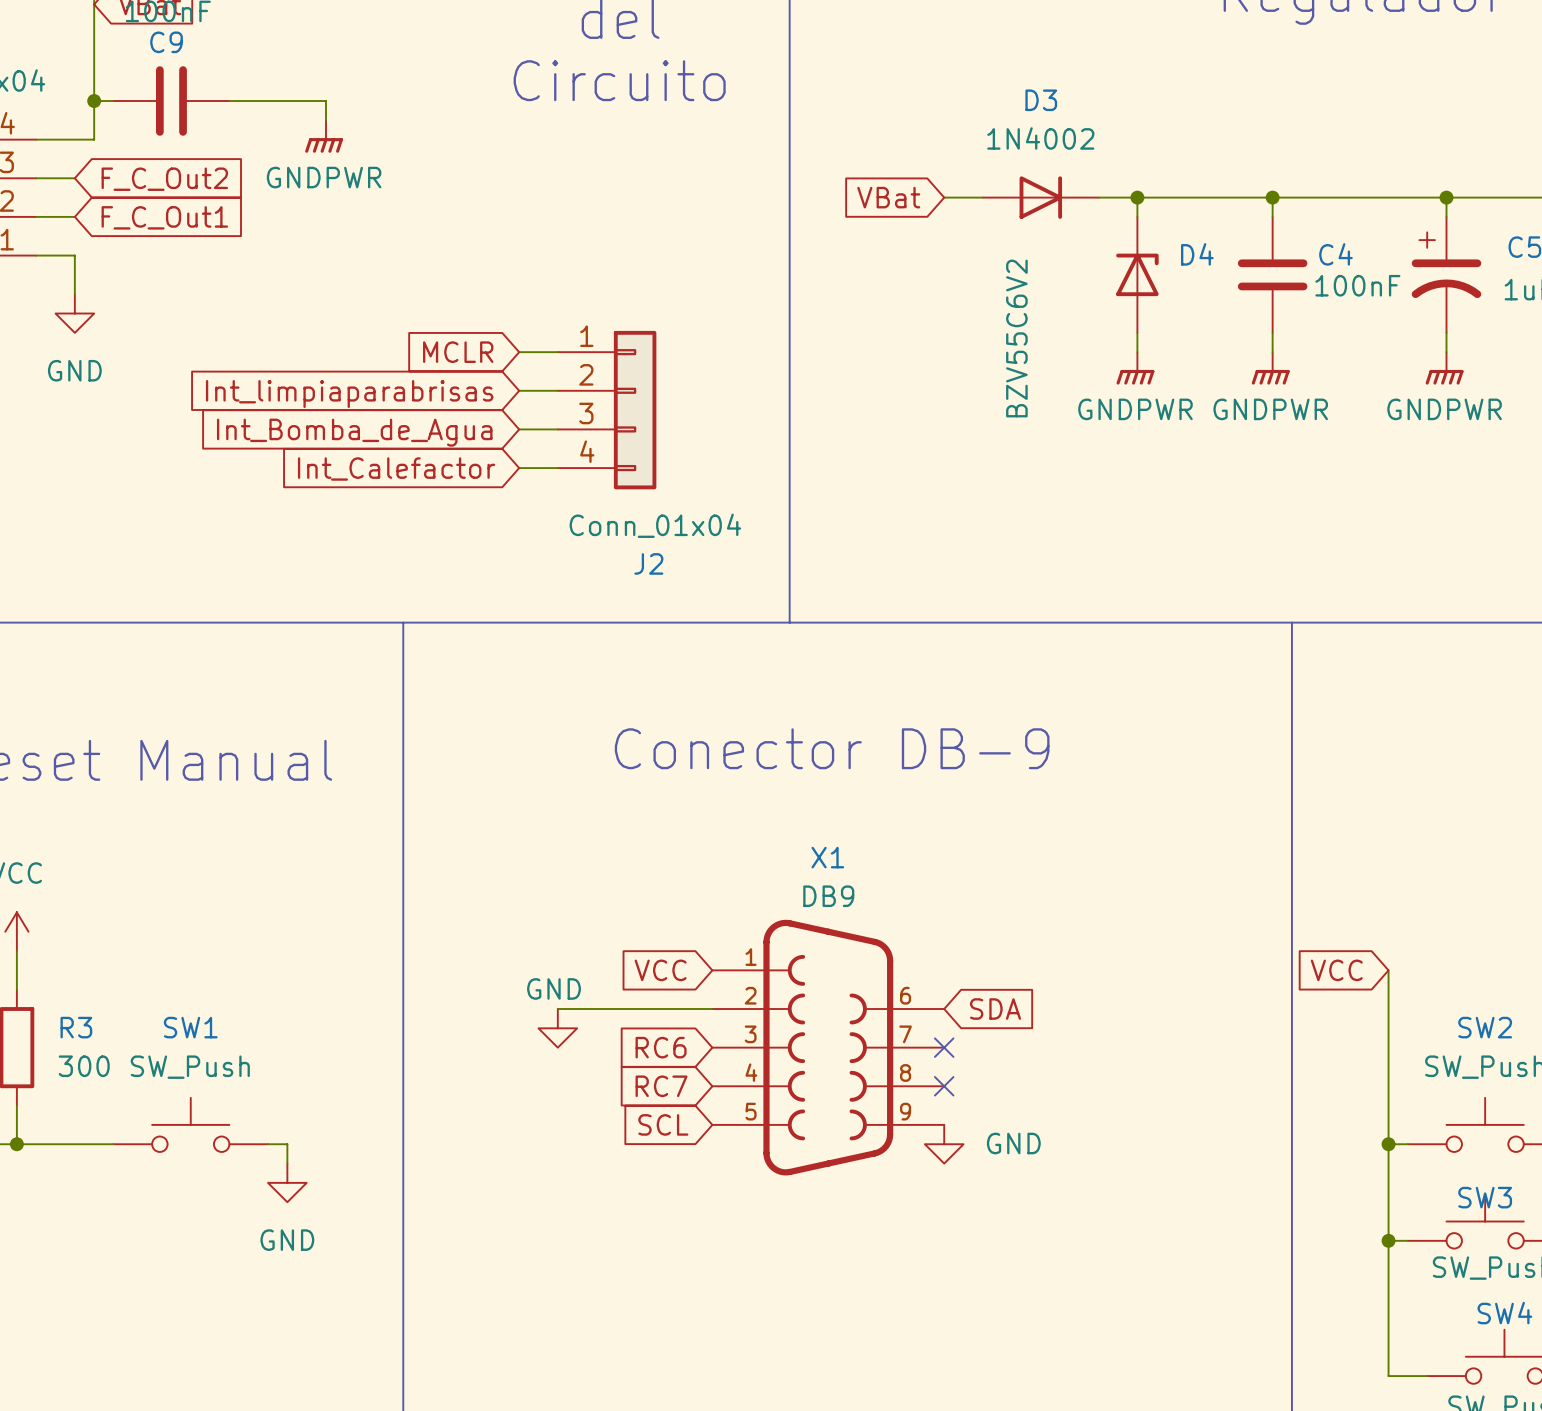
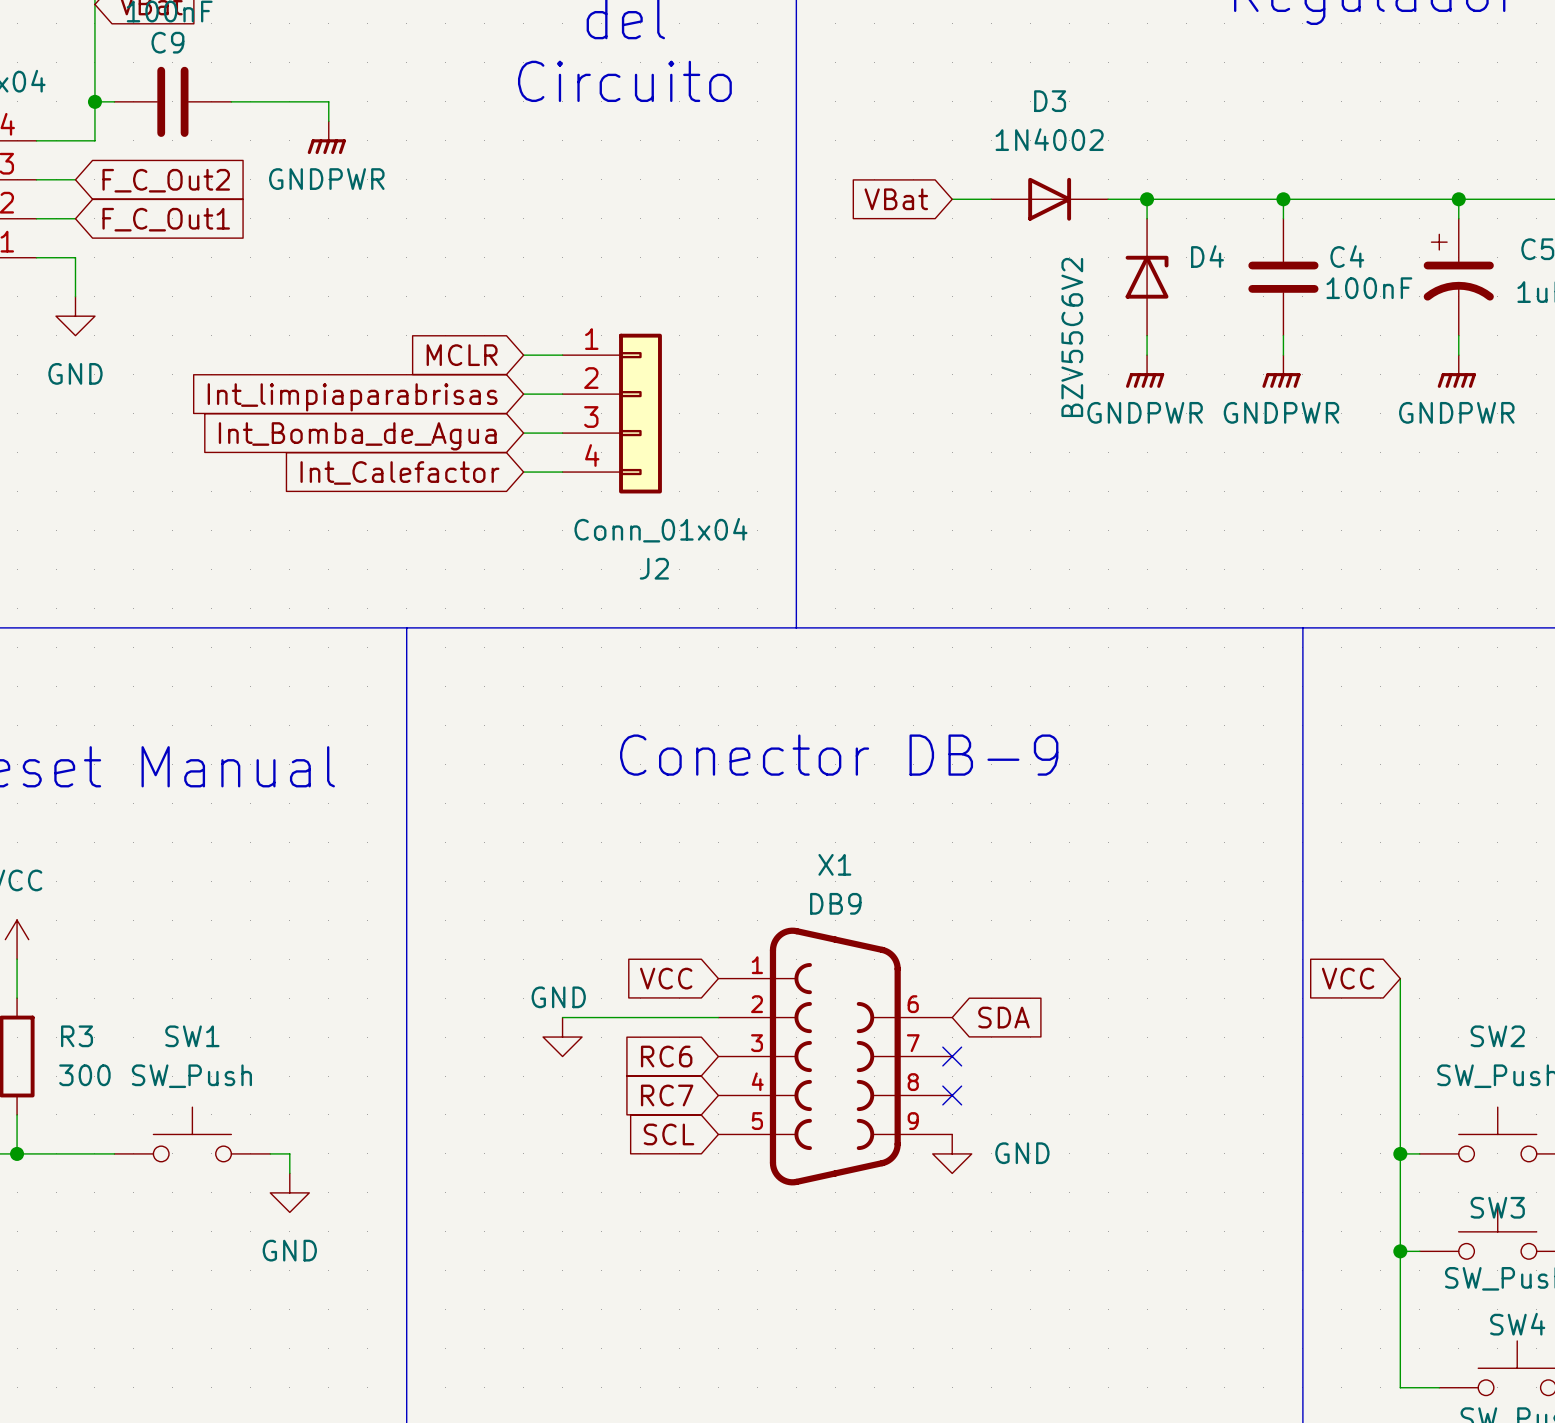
D4 value position: BZV55C6V2 (1016, 338) -> BZV55C6V2 (1072, 337)

